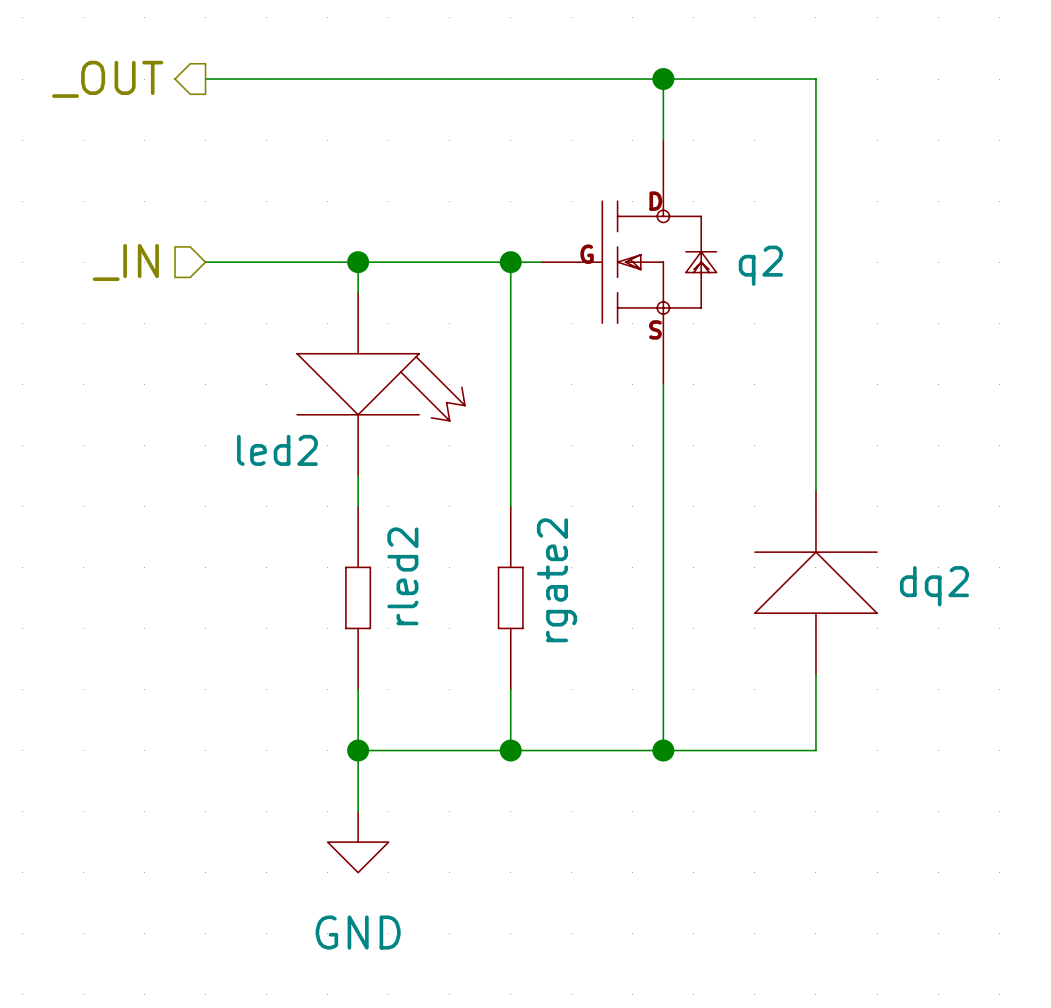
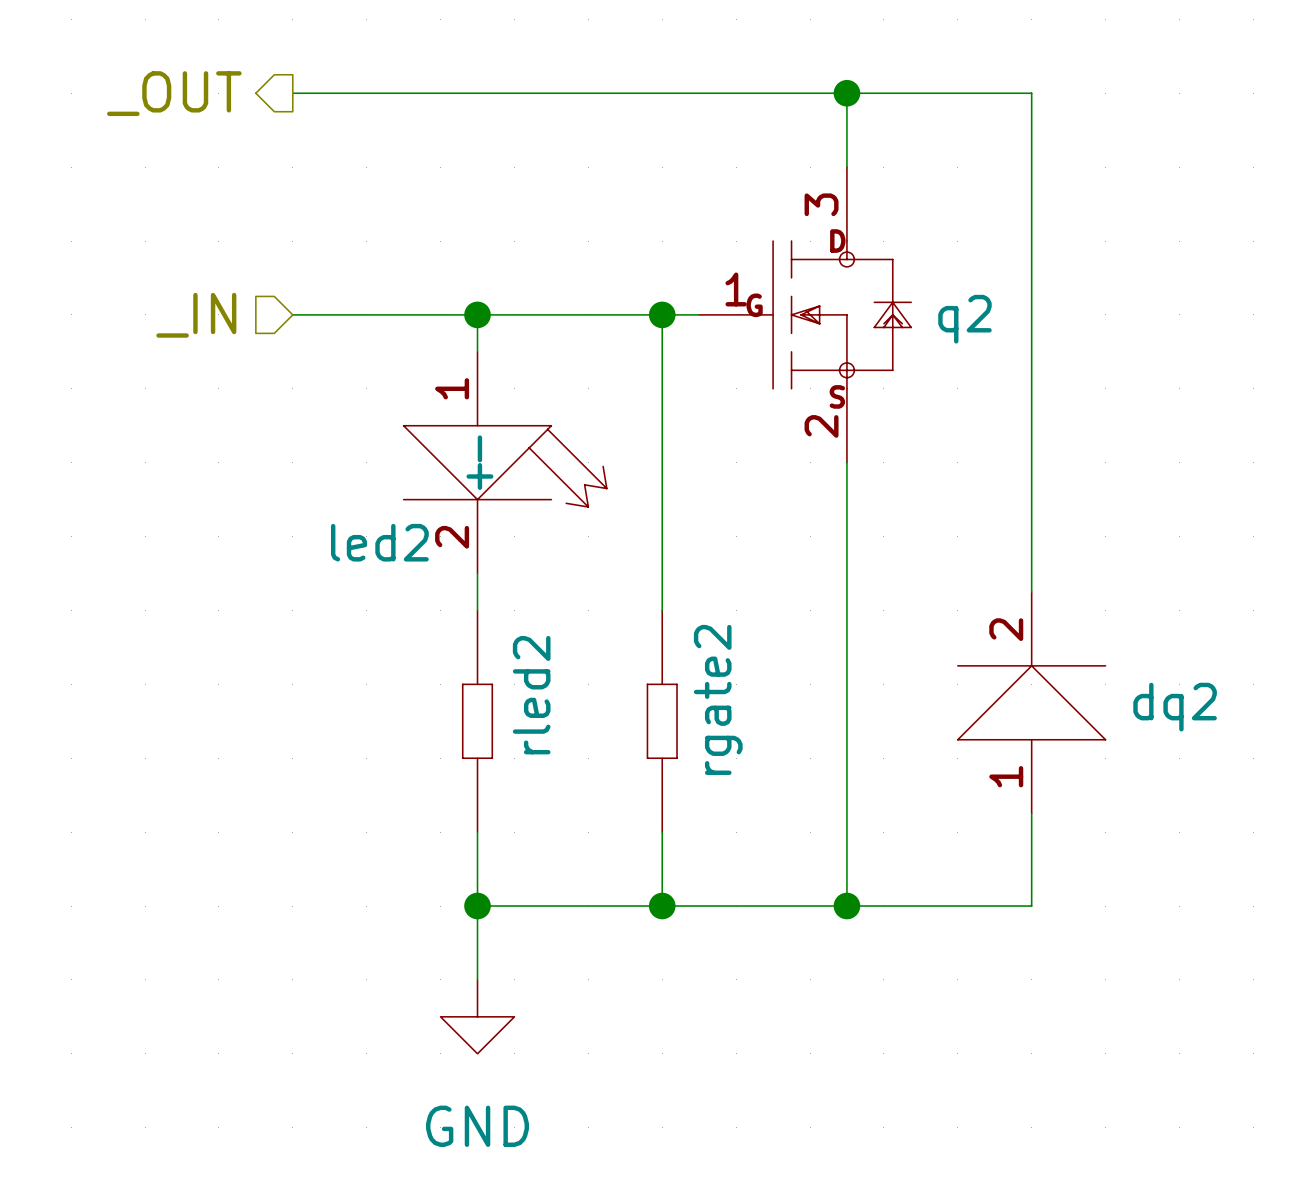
q2 pin number: none -> 3 (821, 204)
q2 pin number: none -> 1 (736, 289)
led2 pin number: none -> 1 (452, 388)
q2 pin number: none -> 2 (821, 426)
led2 pin name: none -> - (479, 448)
led2 pin name: none -> + (479, 476)
led2 pin number: none -> 2 (452, 537)
dq2 pin number: none -> 2 (1006, 629)
dq2 pin number: none -> 1 (1006, 776)

